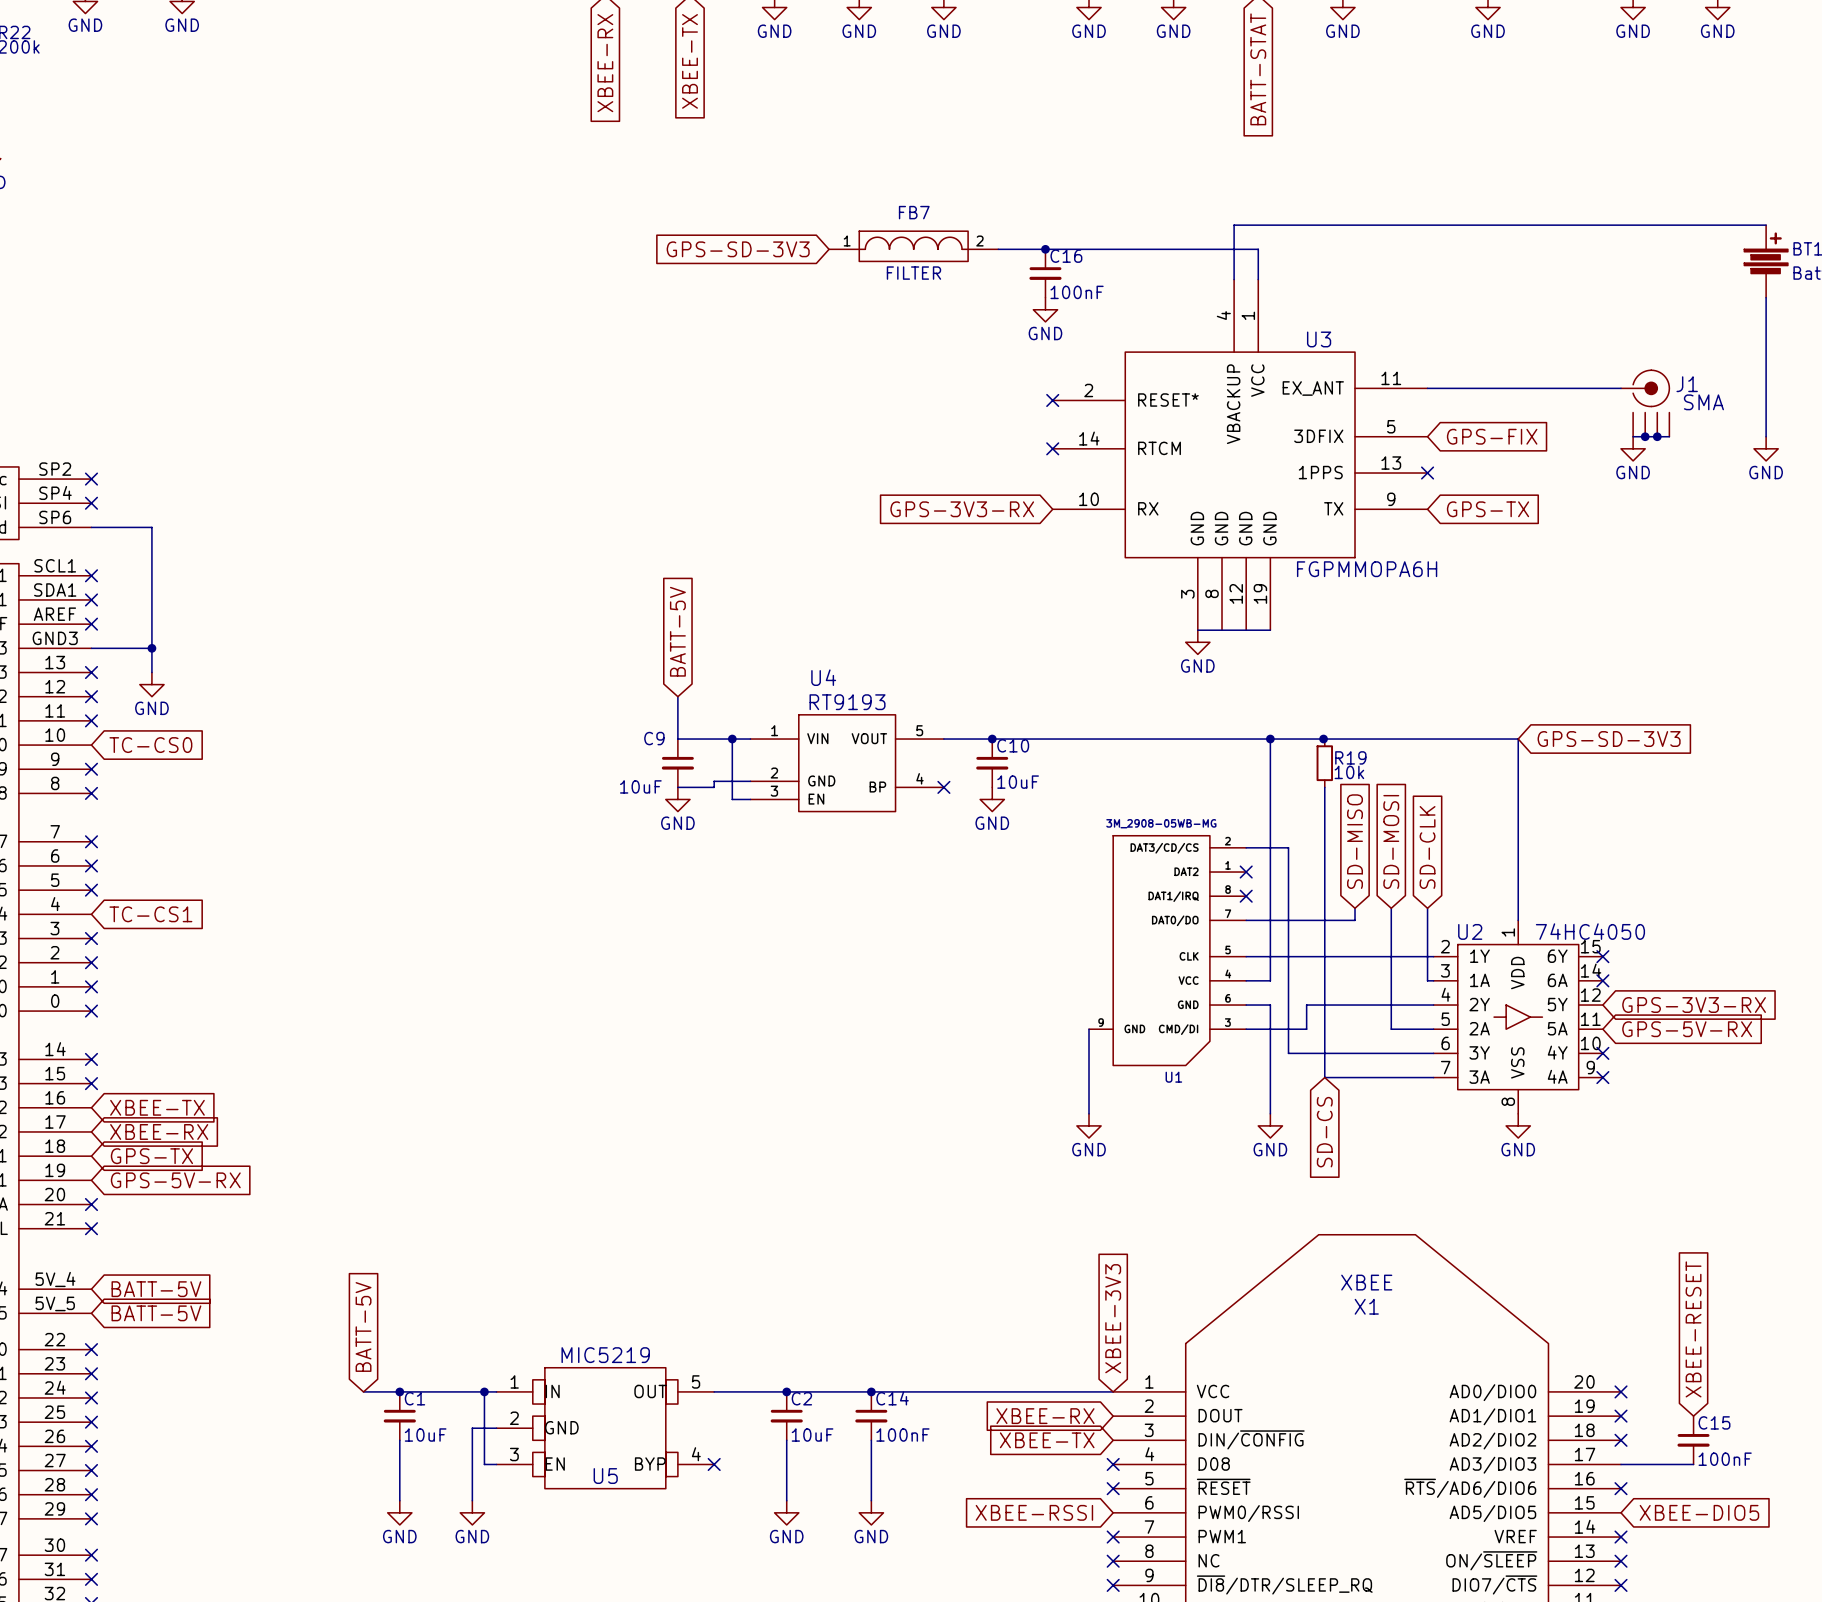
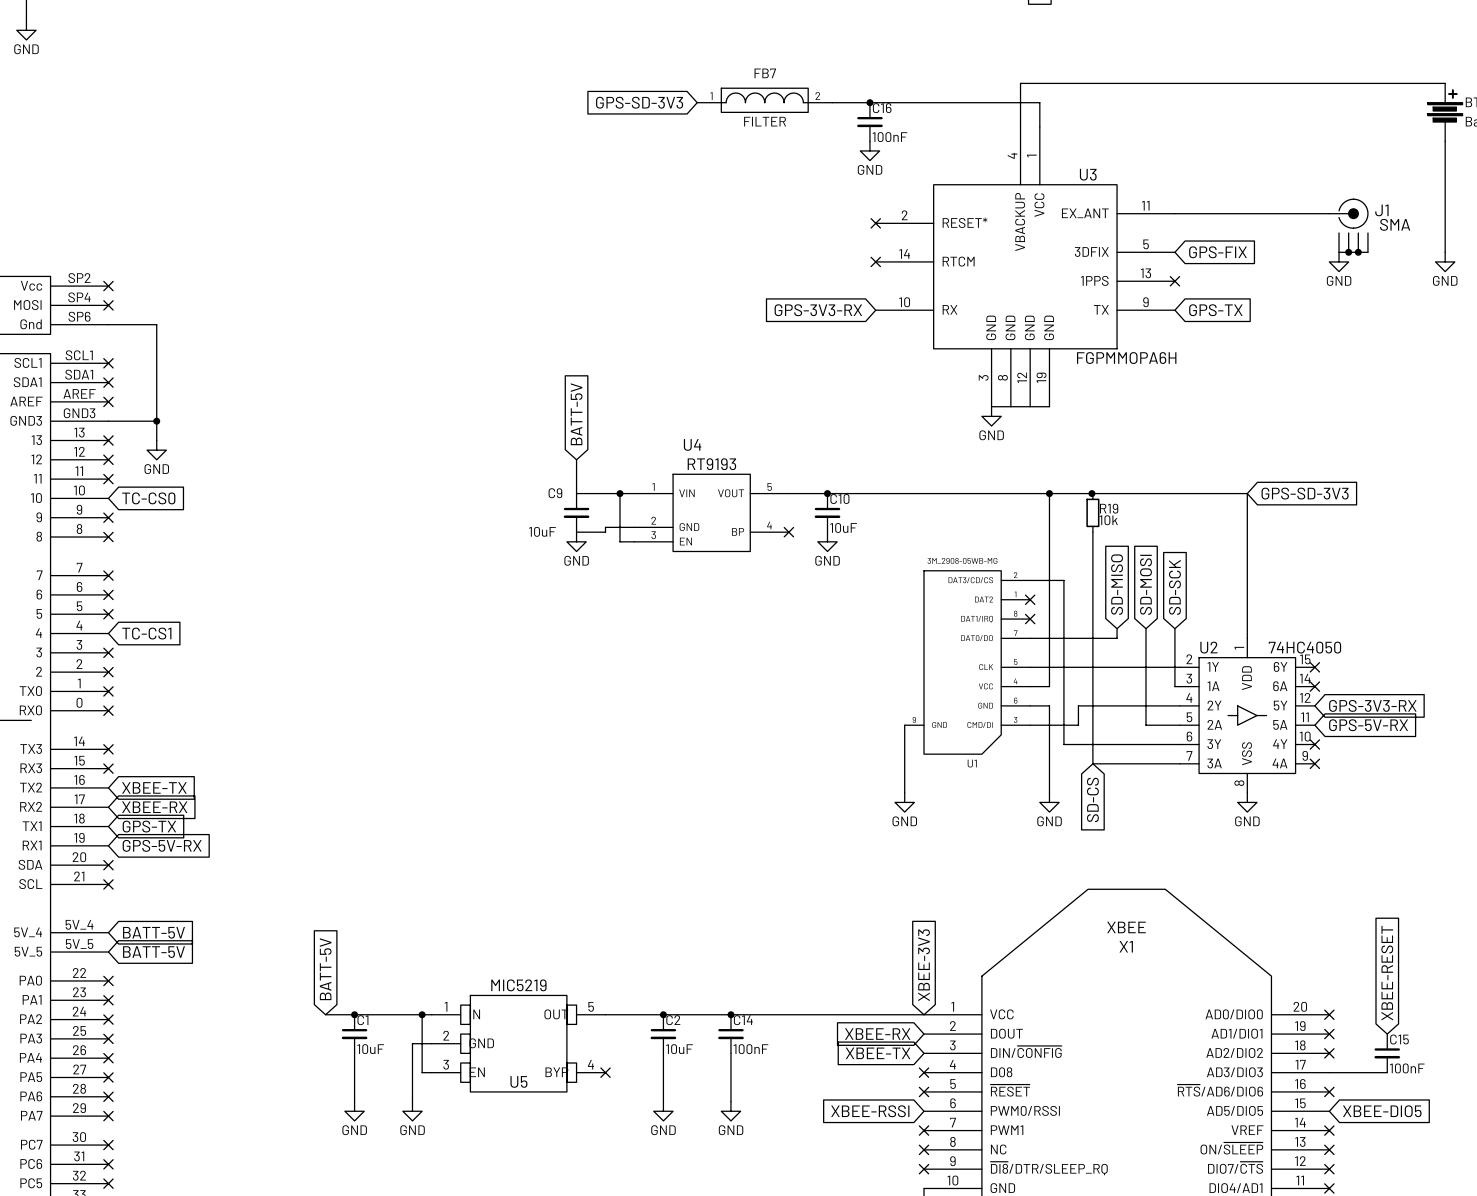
global label: SD-CLK (1427, 847) -> SD-SCK (1174, 587)

